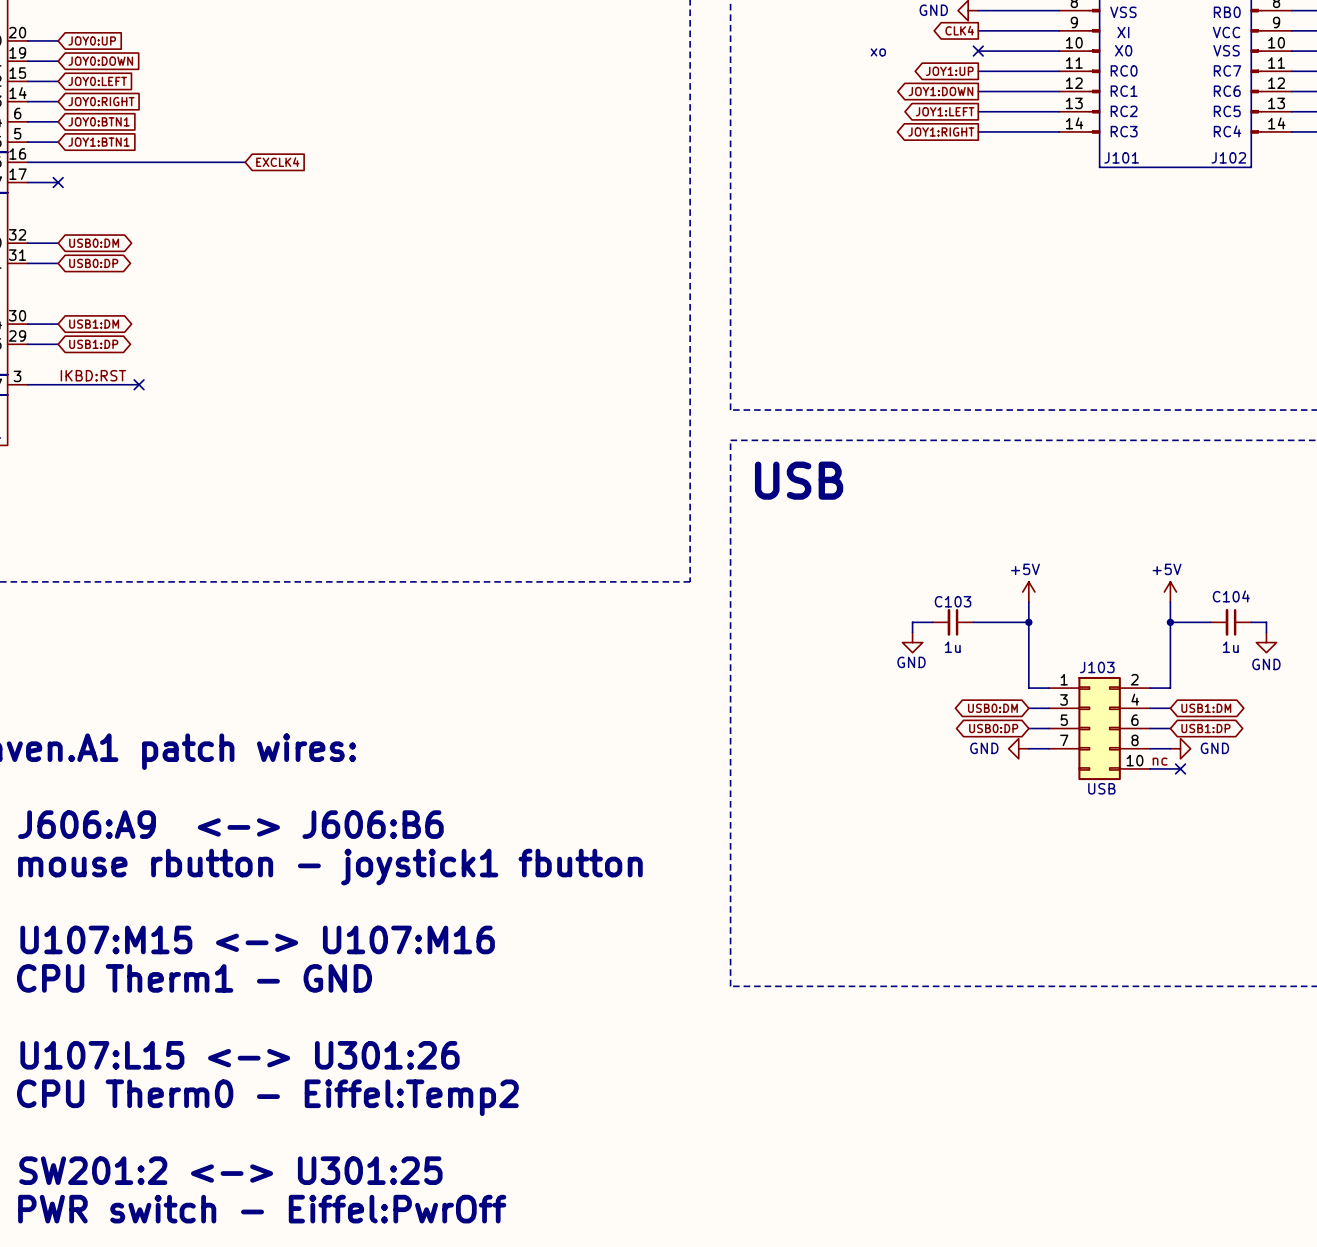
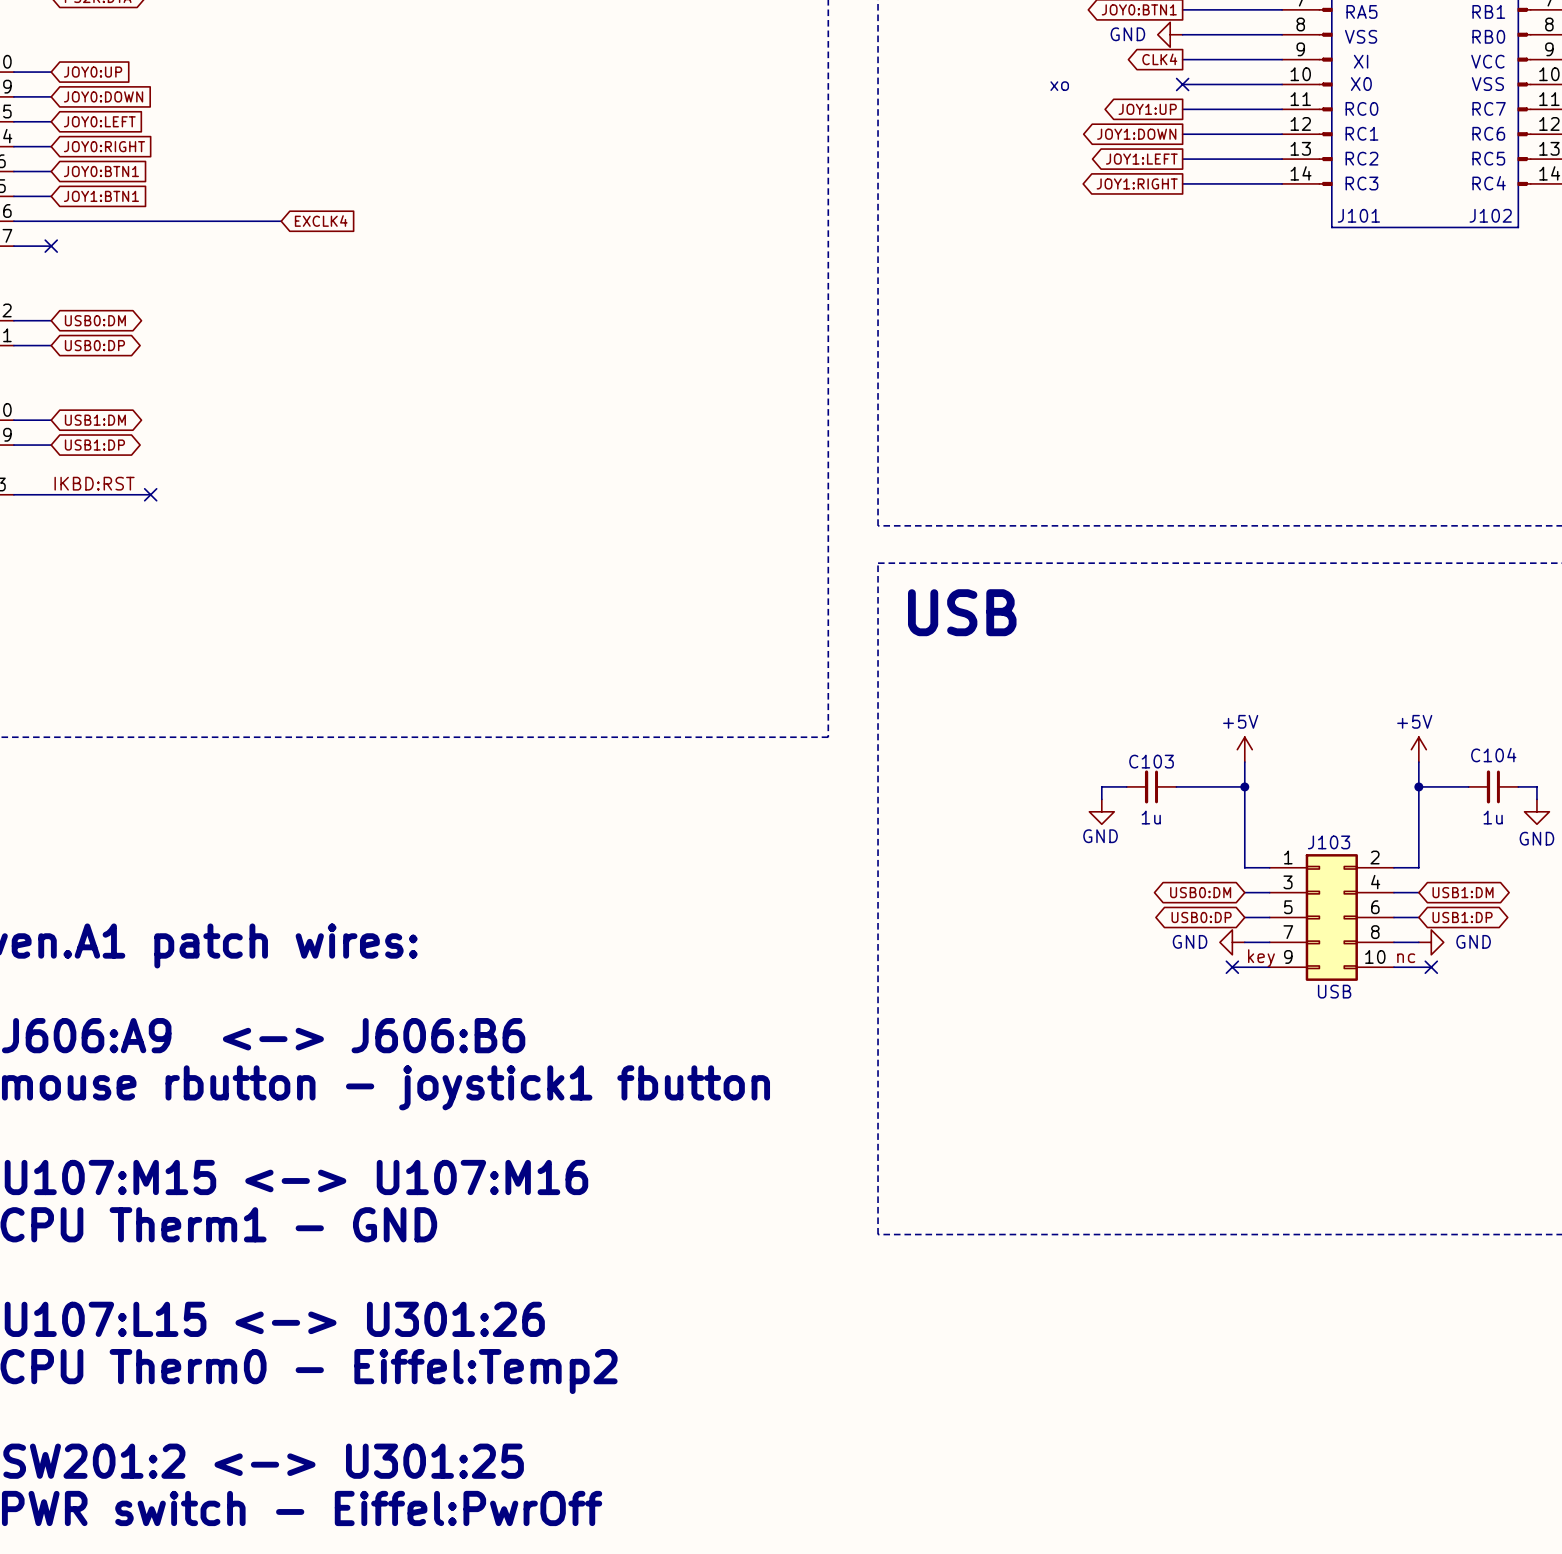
J103 symbol: [1049, 676, 1151, 781] -> [1269, 854, 1394, 981]
label: none -> key (1261, 958)
wire: none -> (1232, 967) (1269, 967)
no-connect mark: none -> (1232, 967)

